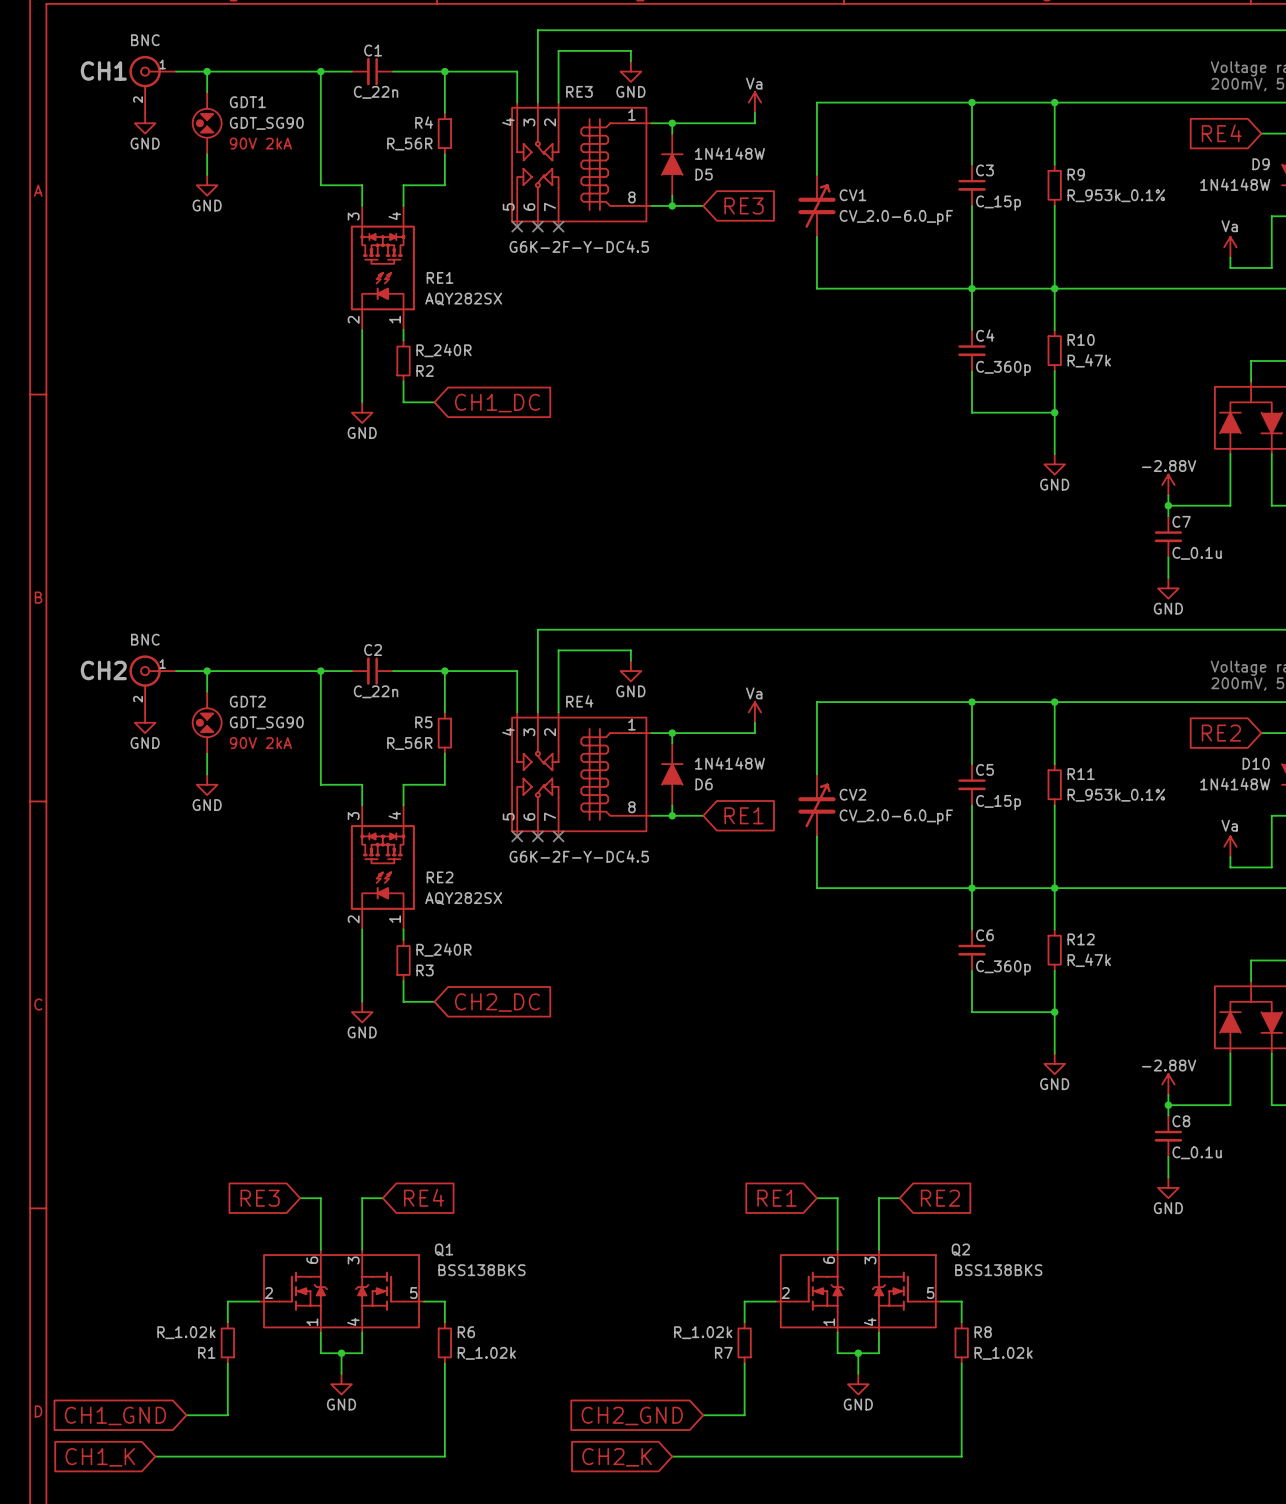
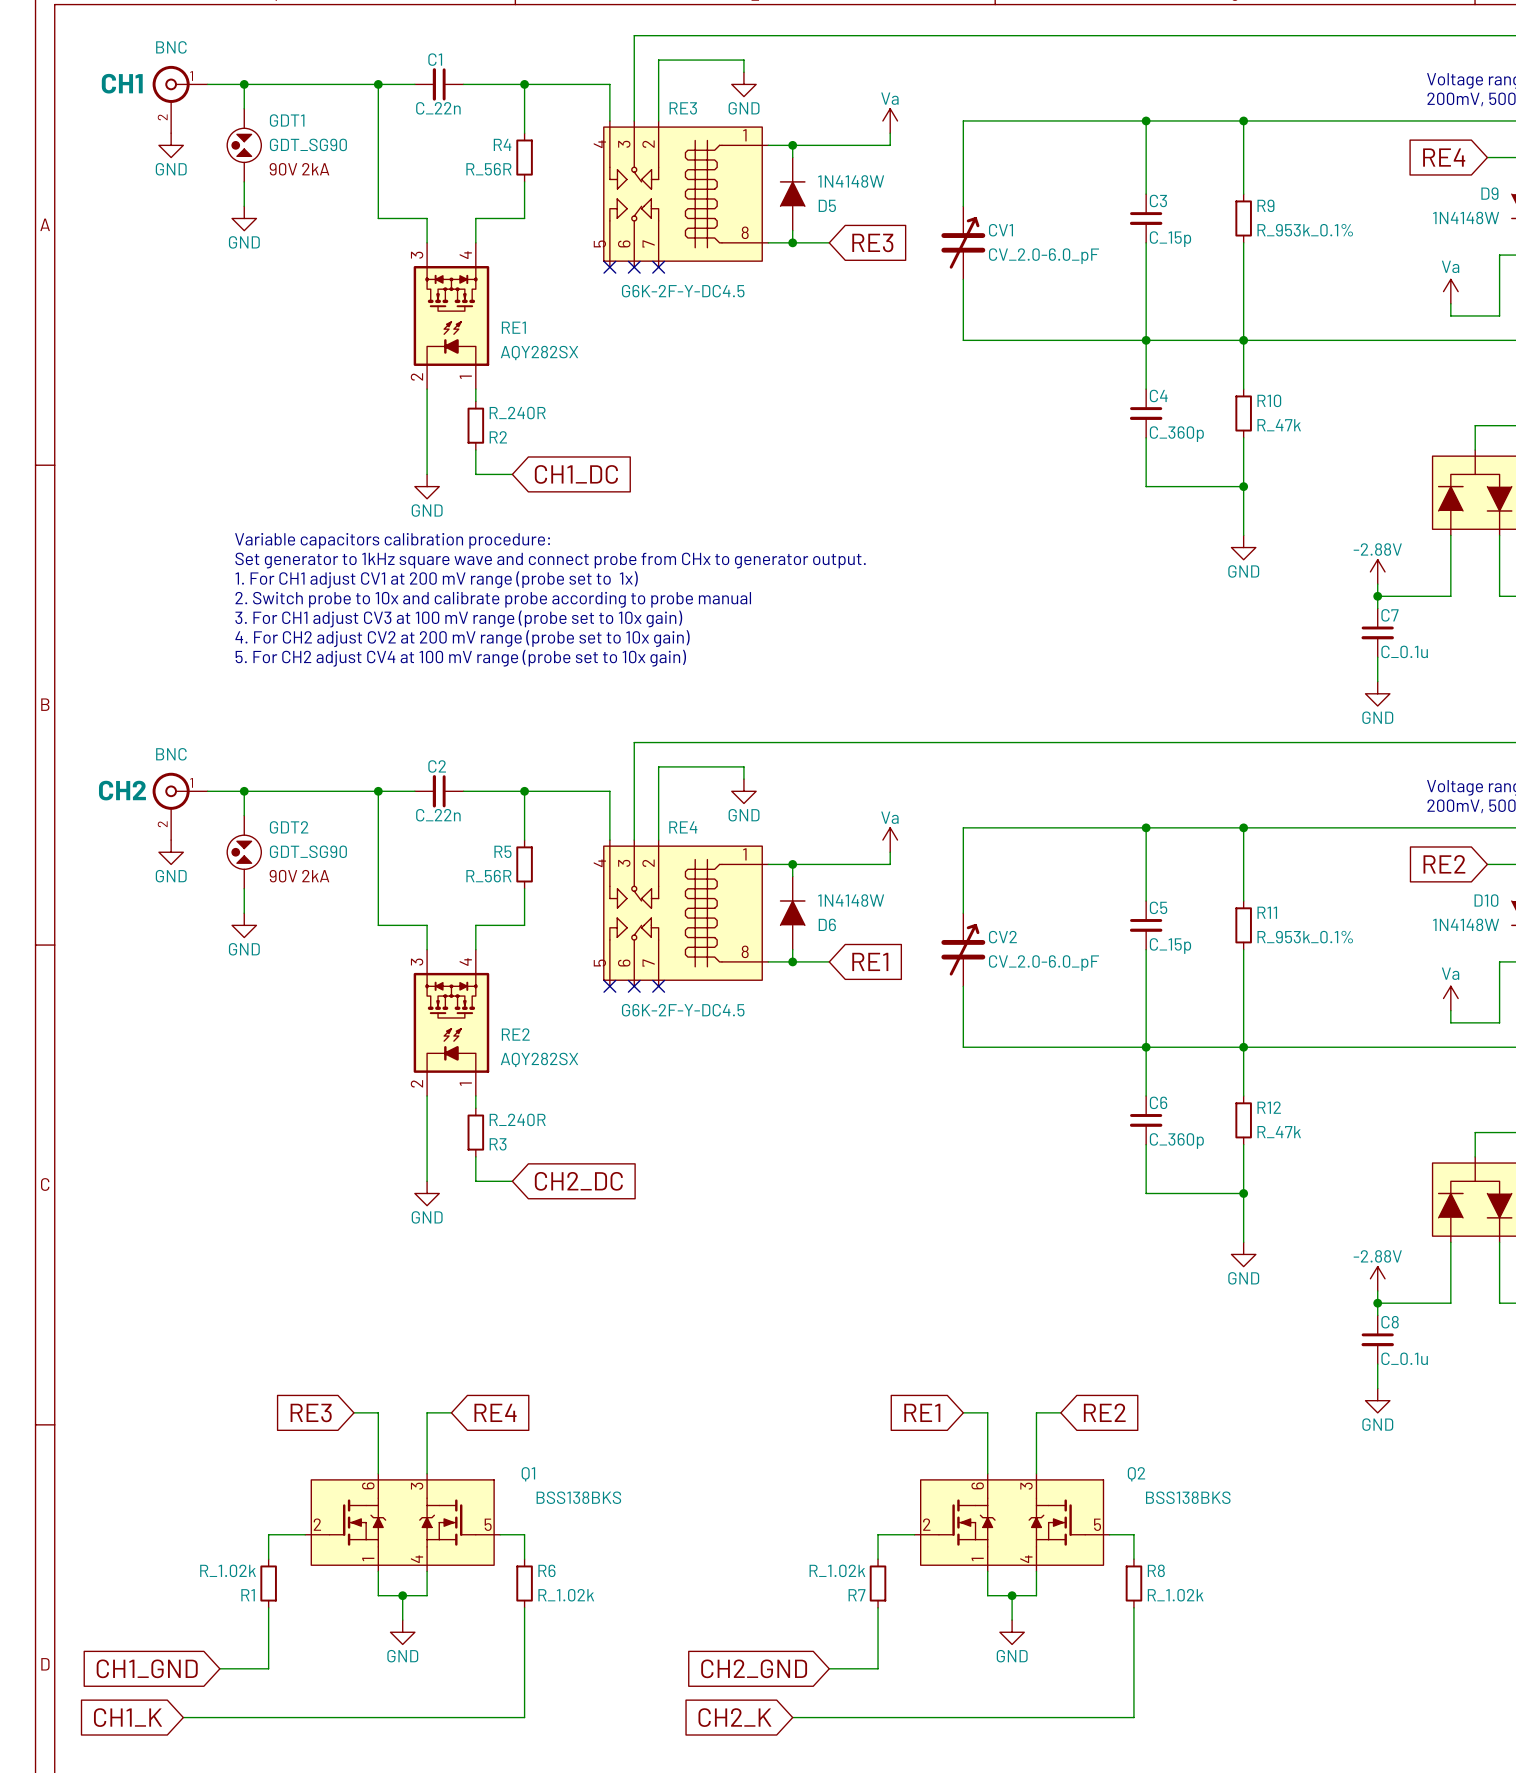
text: none -> Variable capacitors calibration procedure: (392, 540)
text: none -> Set generator to 1kHz square wave and connect probe from CHx to generator output. (550, 560)
text: none -> 1. For CH1 adjust CV1 at 200 mV range (probe set to 1x) (436, 579)
text: none -> 2. Switch probe to 10x and calibrate probe according to probe manual (493, 599)
text: none -> 3. For CH1 adjust CV3 at 100 mV range (probe set to 10x gain) (458, 619)
text: none -> 4. For CH2 adjust CV2 at 200 mV range (probe set to 10x gain) (462, 638)
text: none -> 5. For CH2 adjust CV4 at 100 mV range (probe set to 10x gain) (460, 658)

